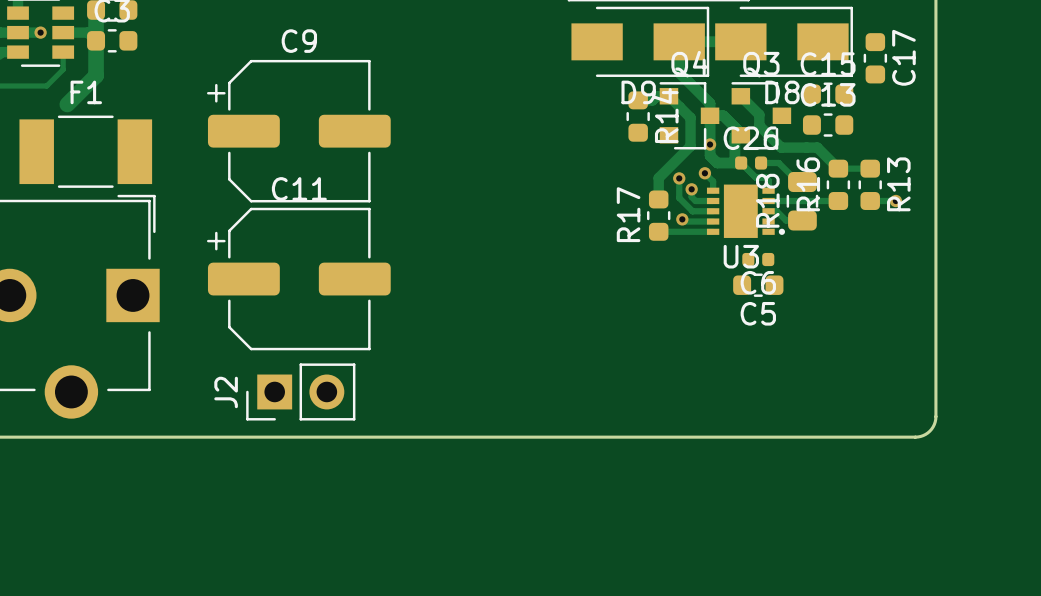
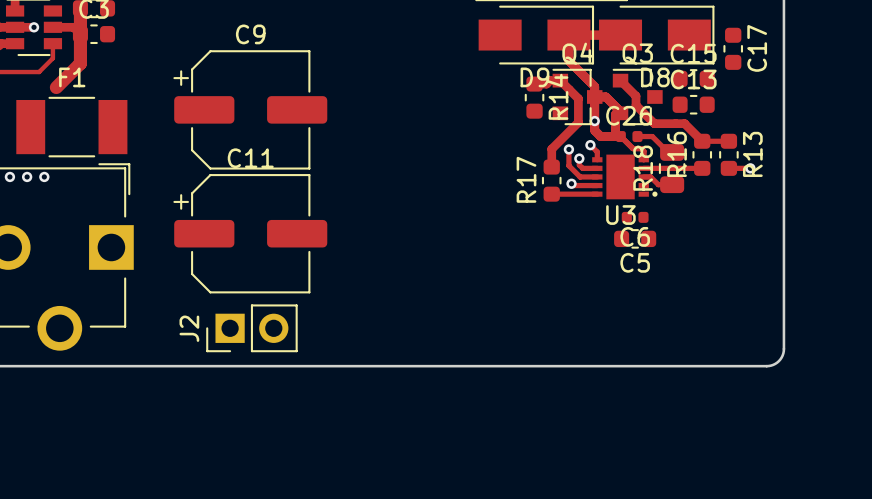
via: none -> (9, 176)
via: none -> (27, 176)
via: none -> (44, 176)

